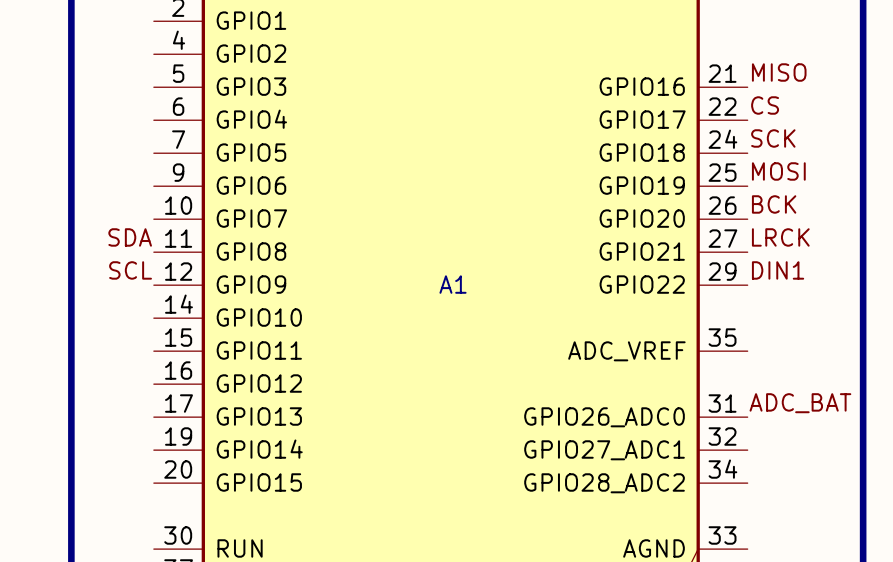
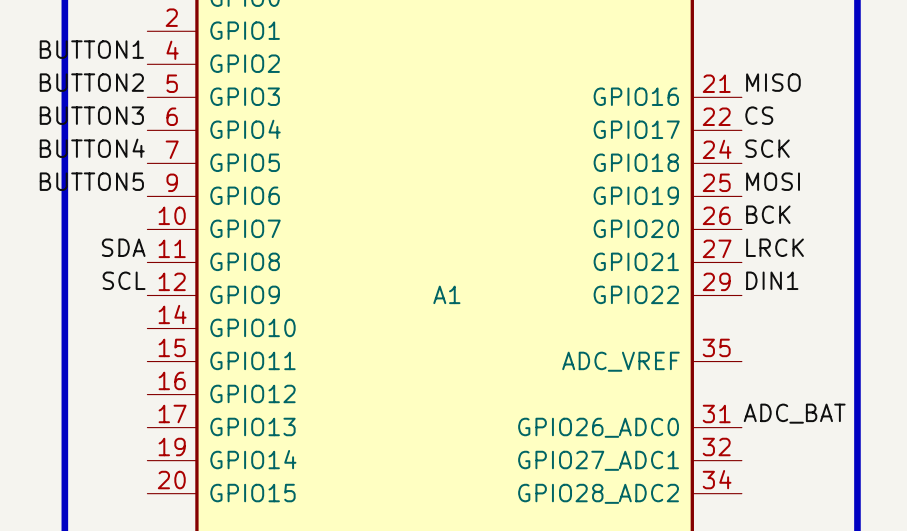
label: none -> BUTTON1 (91, 49)
label: none -> BUTTON2 (91, 82)
label: none -> BUTTON3 (91, 115)
label: none -> BUTTON4 (92, 148)
label: none -> BUTTON5 (91, 181)

